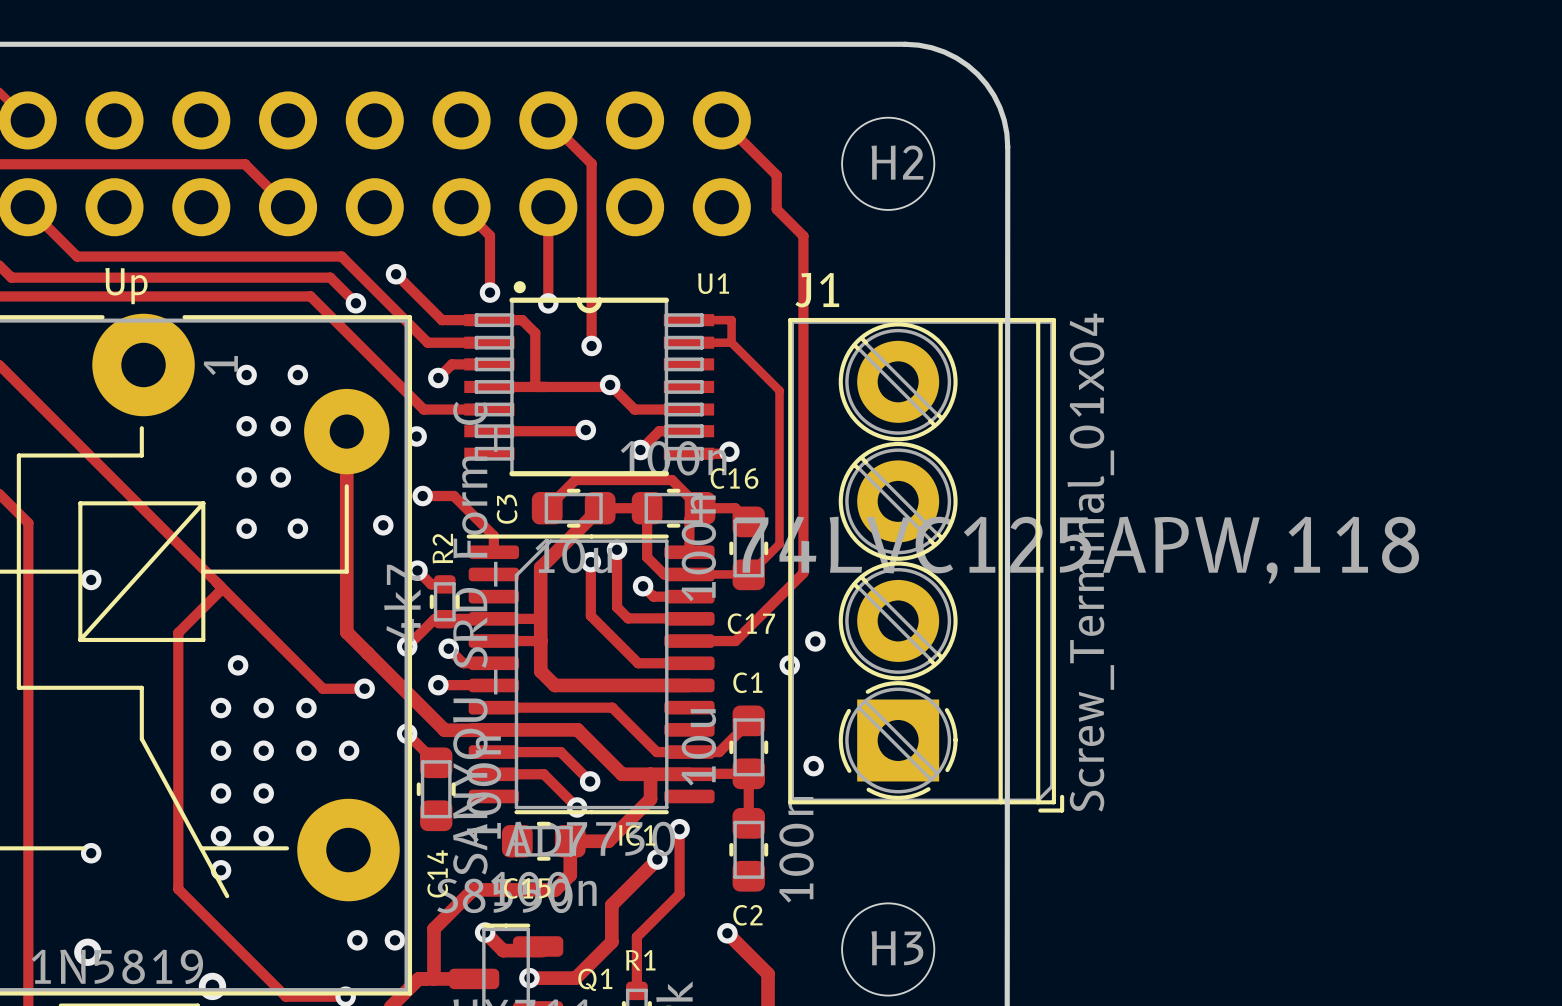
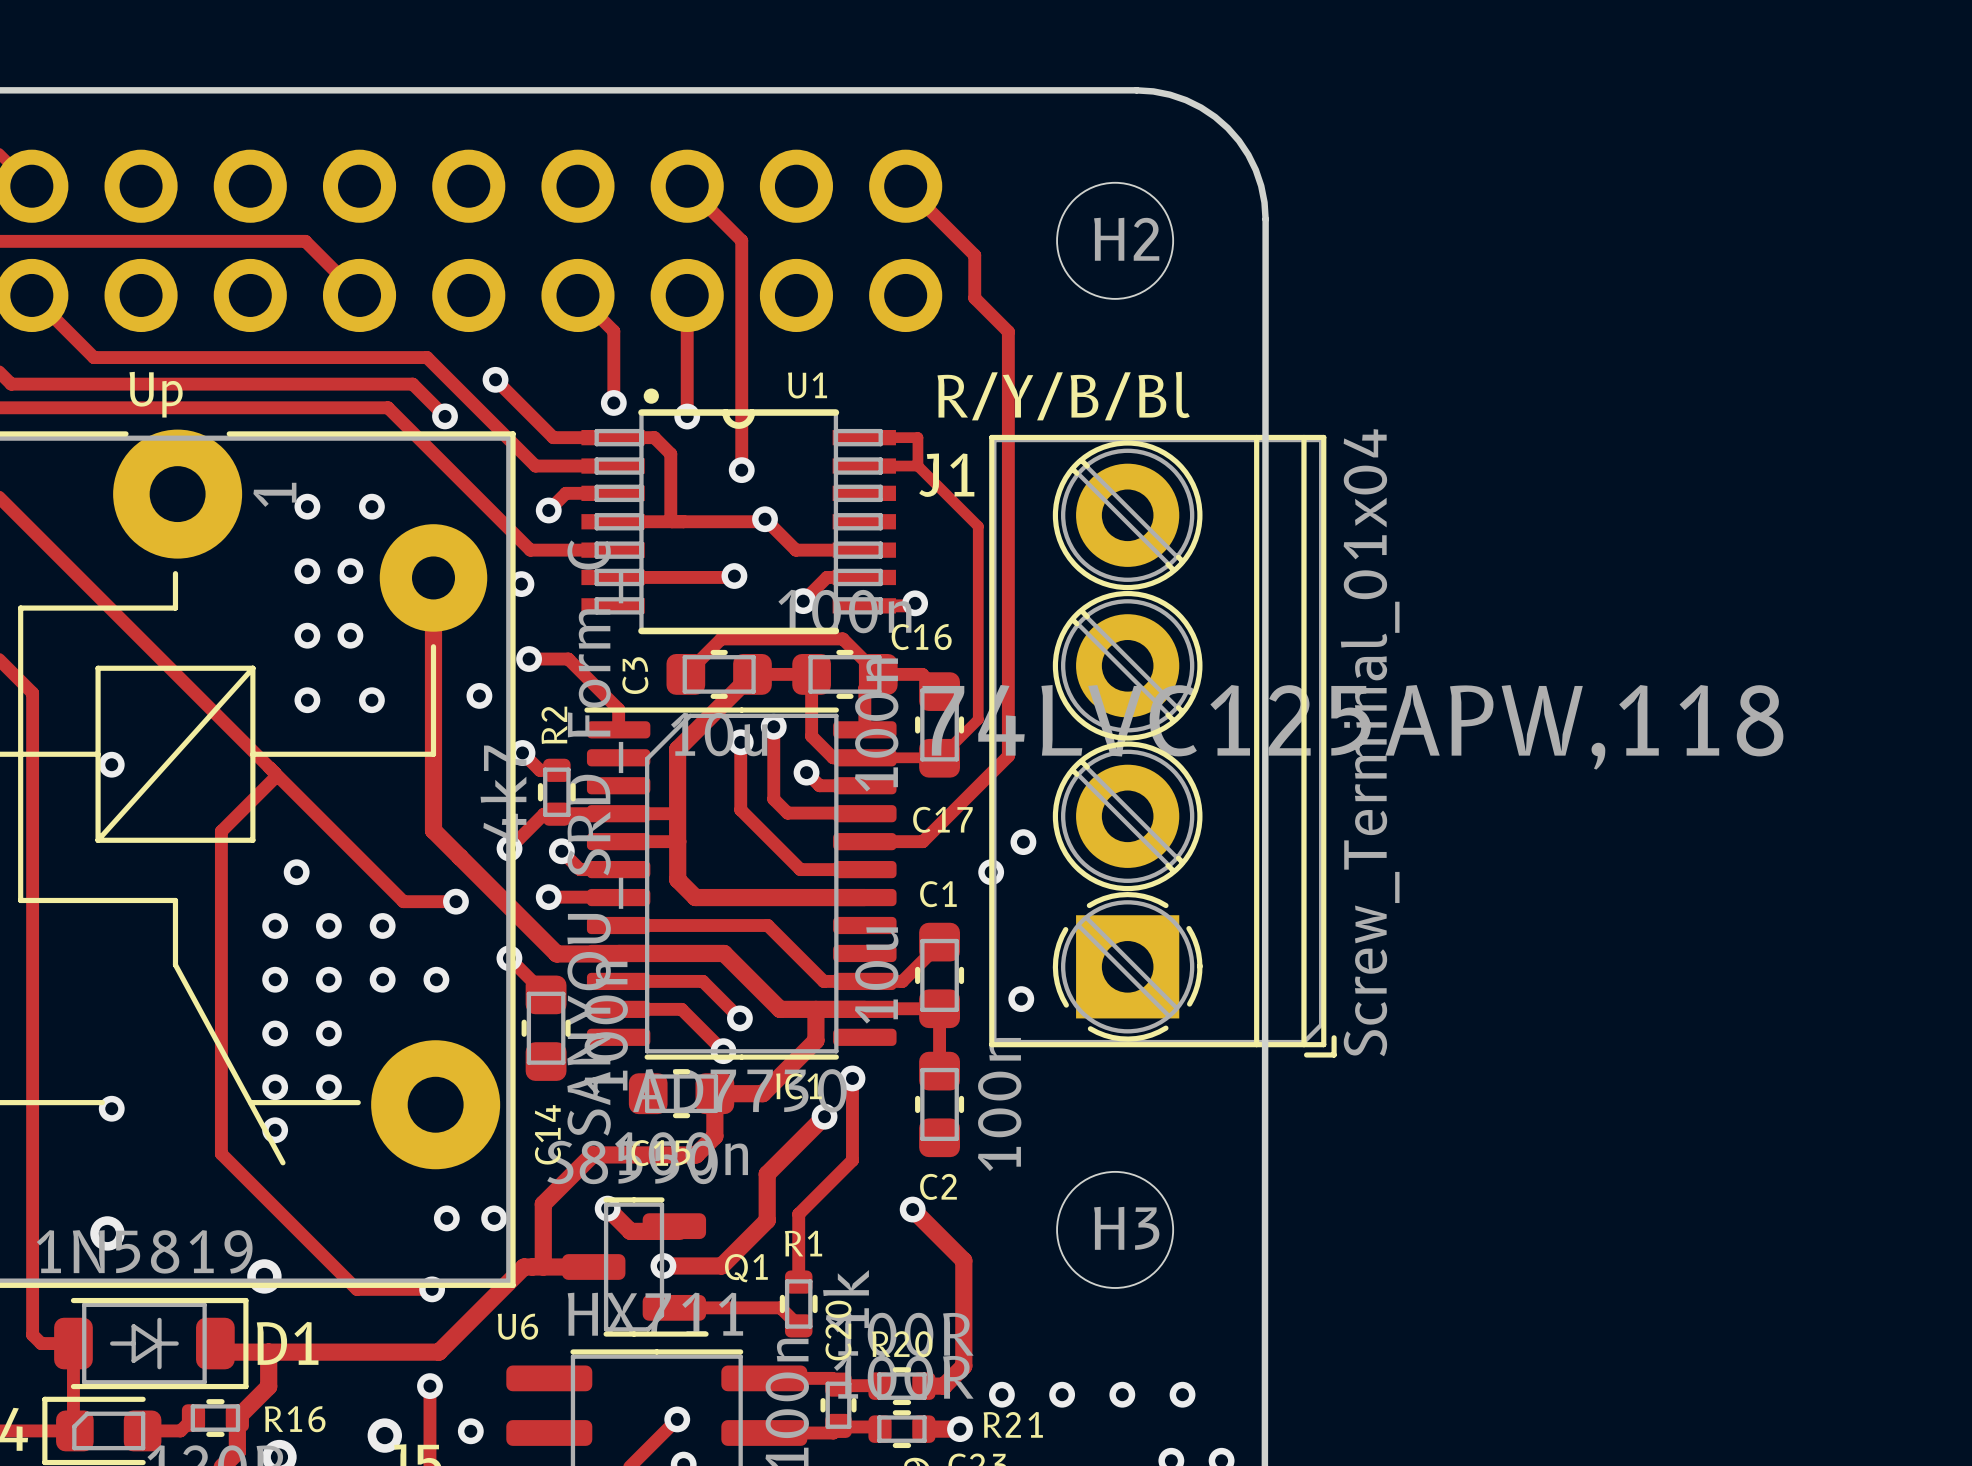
U1 name position: U1 (713, 283) -> U1 (807, 385)
text: none -> R/Y/B/Bl (1063, 396)
J1 name position: J1 (817, 290) -> J1 (946, 475)

